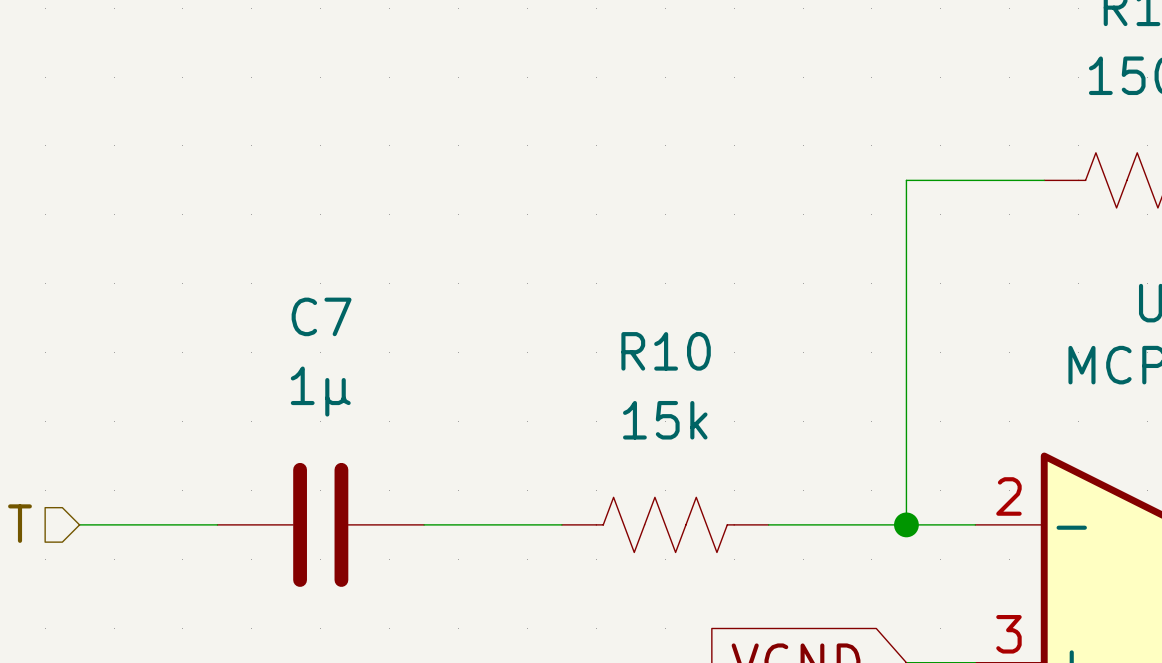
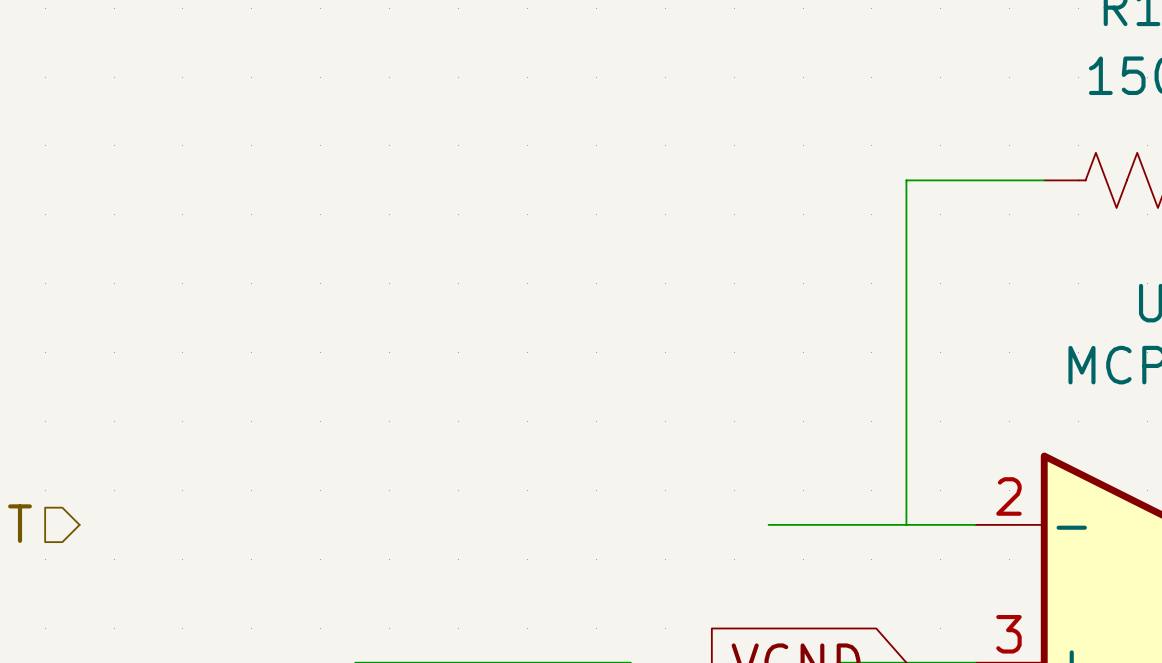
wire: (79, 524) (217, 524) -> none
C7: 1µ (320, 524) -> none
wire: (424, 524) (561, 524) -> none
R10: 15k (665, 524) -> none
junction: (906, 524) -> none
wire: none -> (355, 662) (630, 662)
wire: none -> (837, 662) (906, 662)

